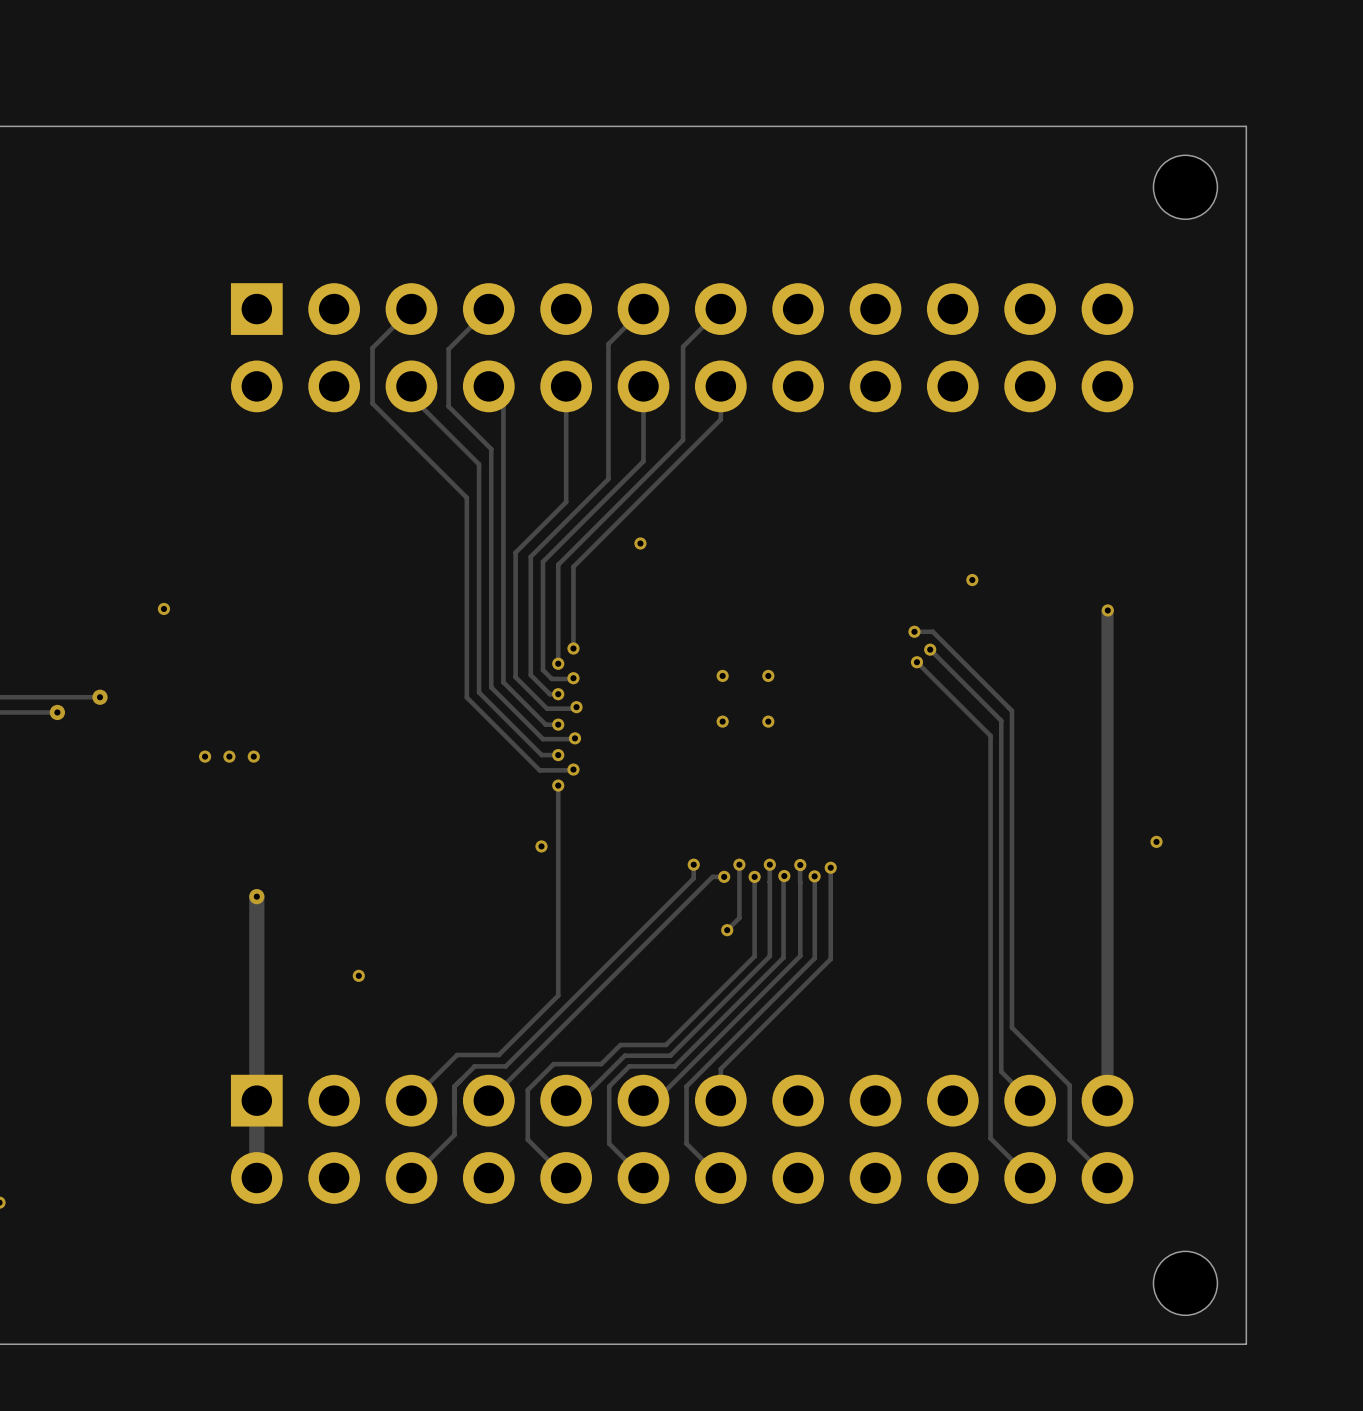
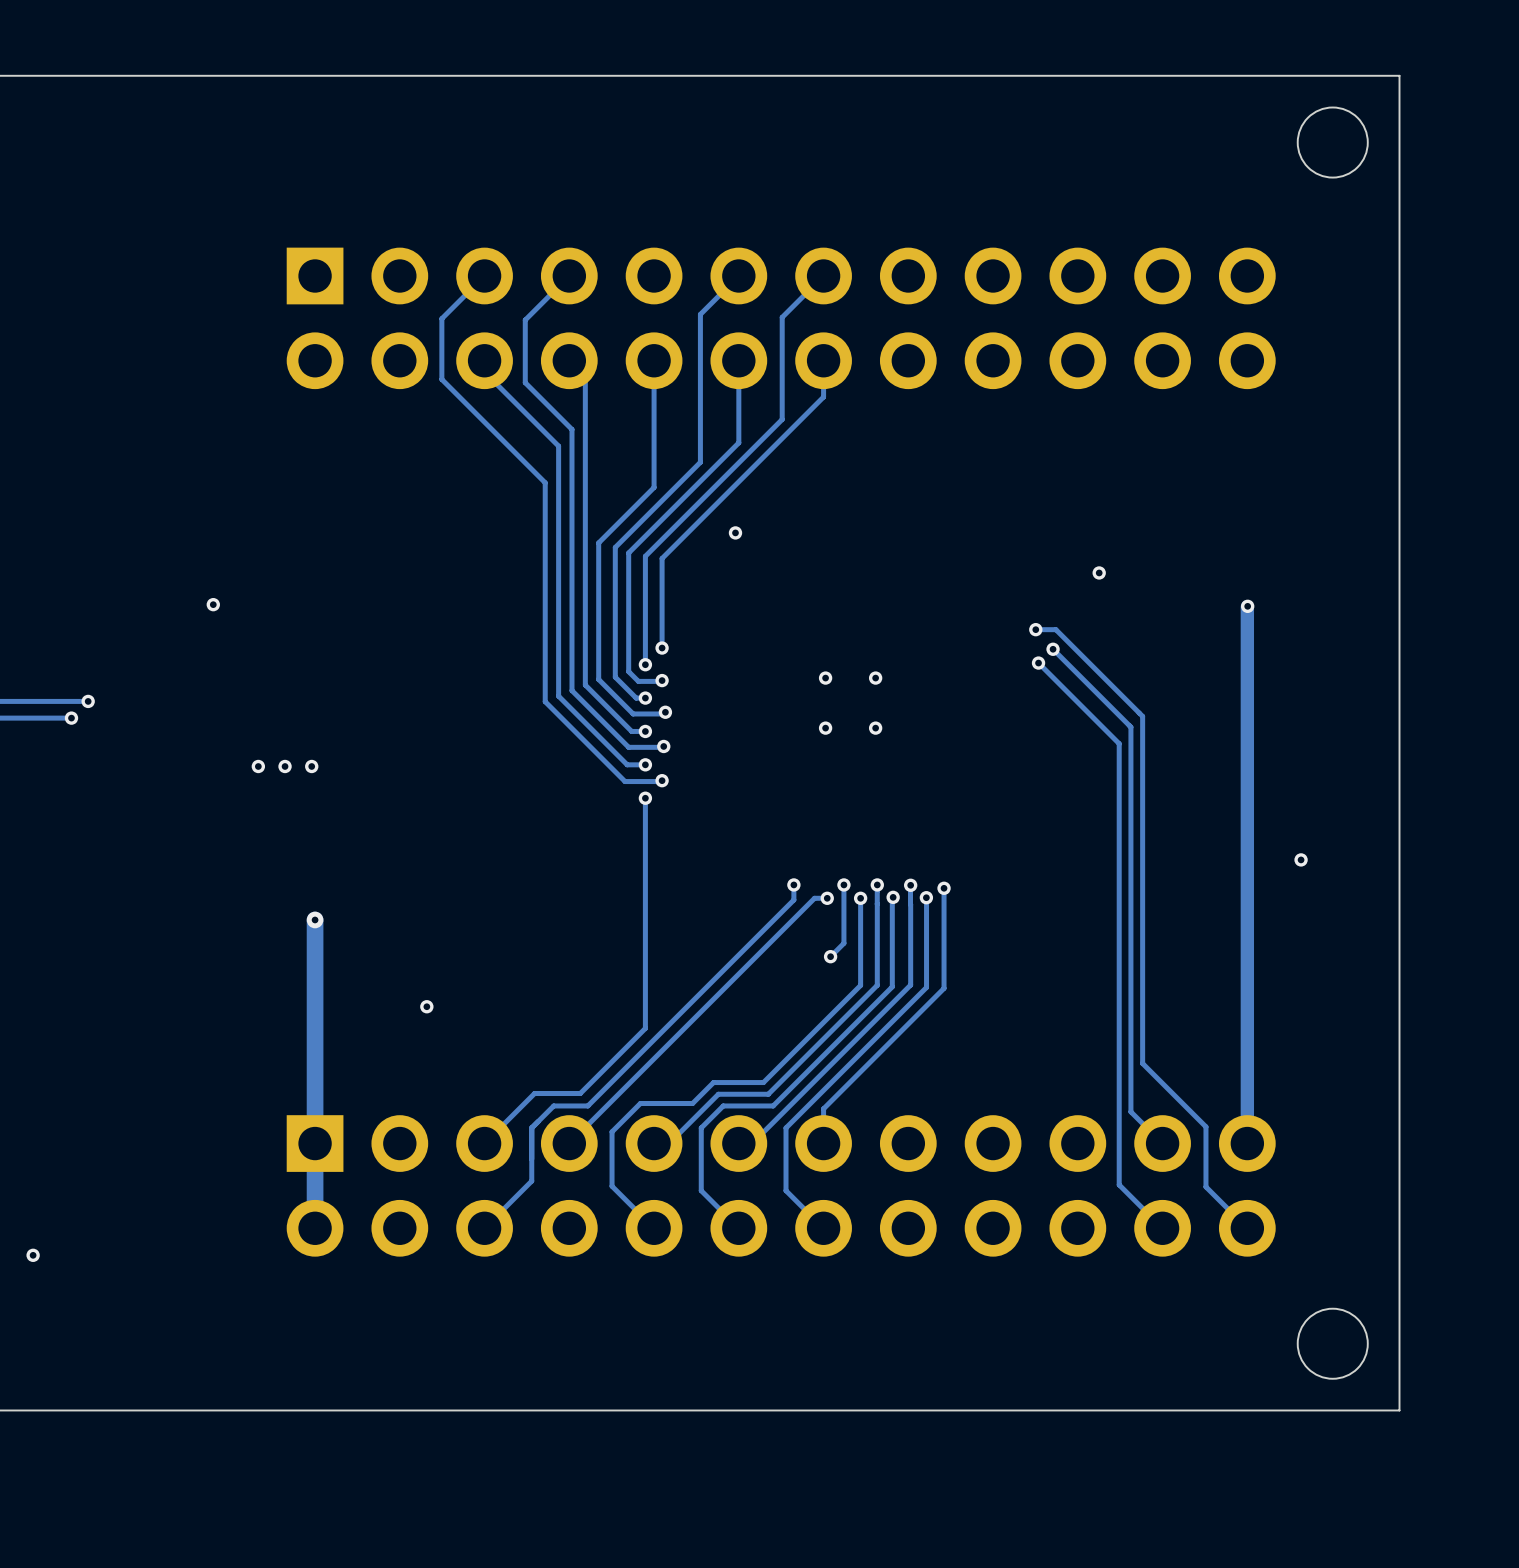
via: none -> (88, 701)
track: (100, 697) (49, 697) -> none
via: (100, 697) -> none
via: none -> (71, 718)
track: (57, 712) (34, 712) -> none
via: (57, 712) -> none
via: (541, 846) -> none

